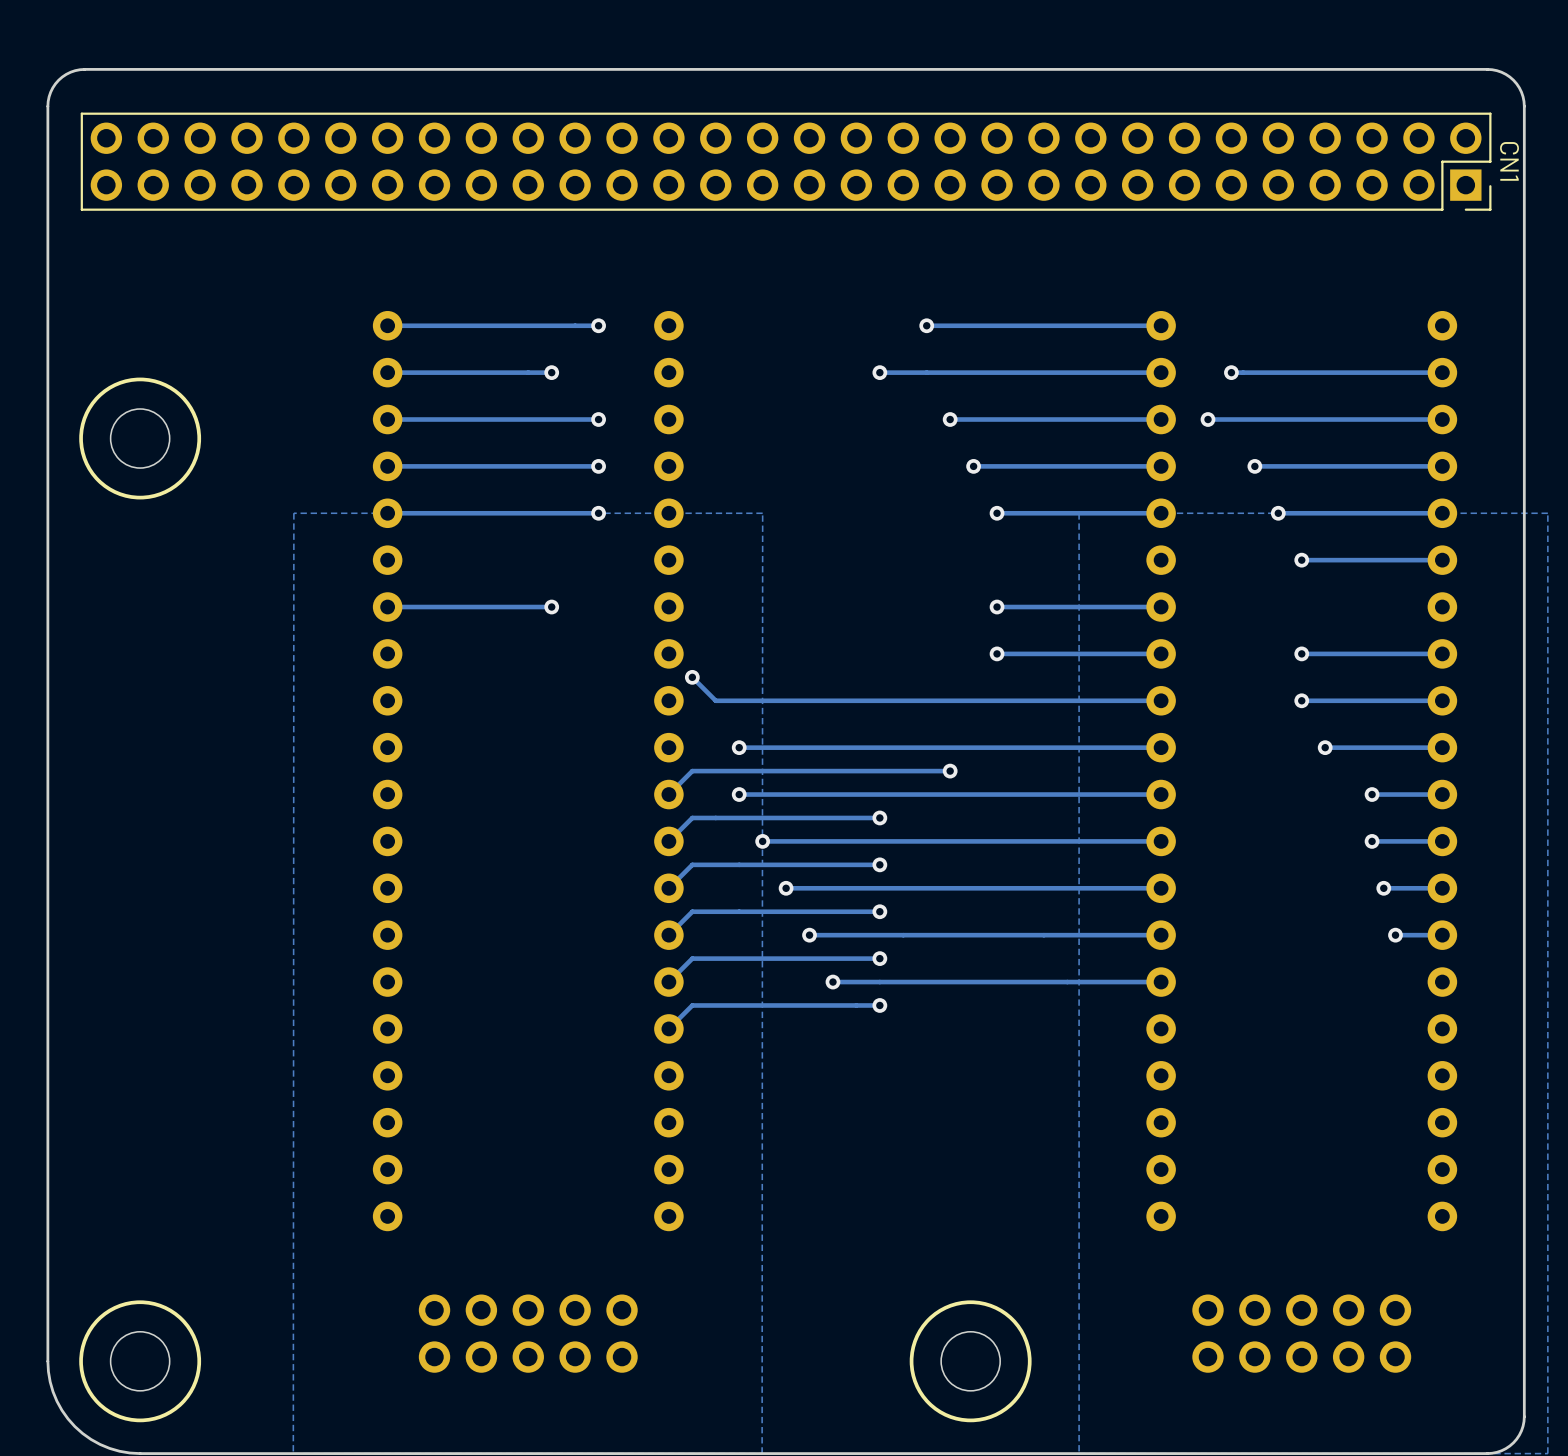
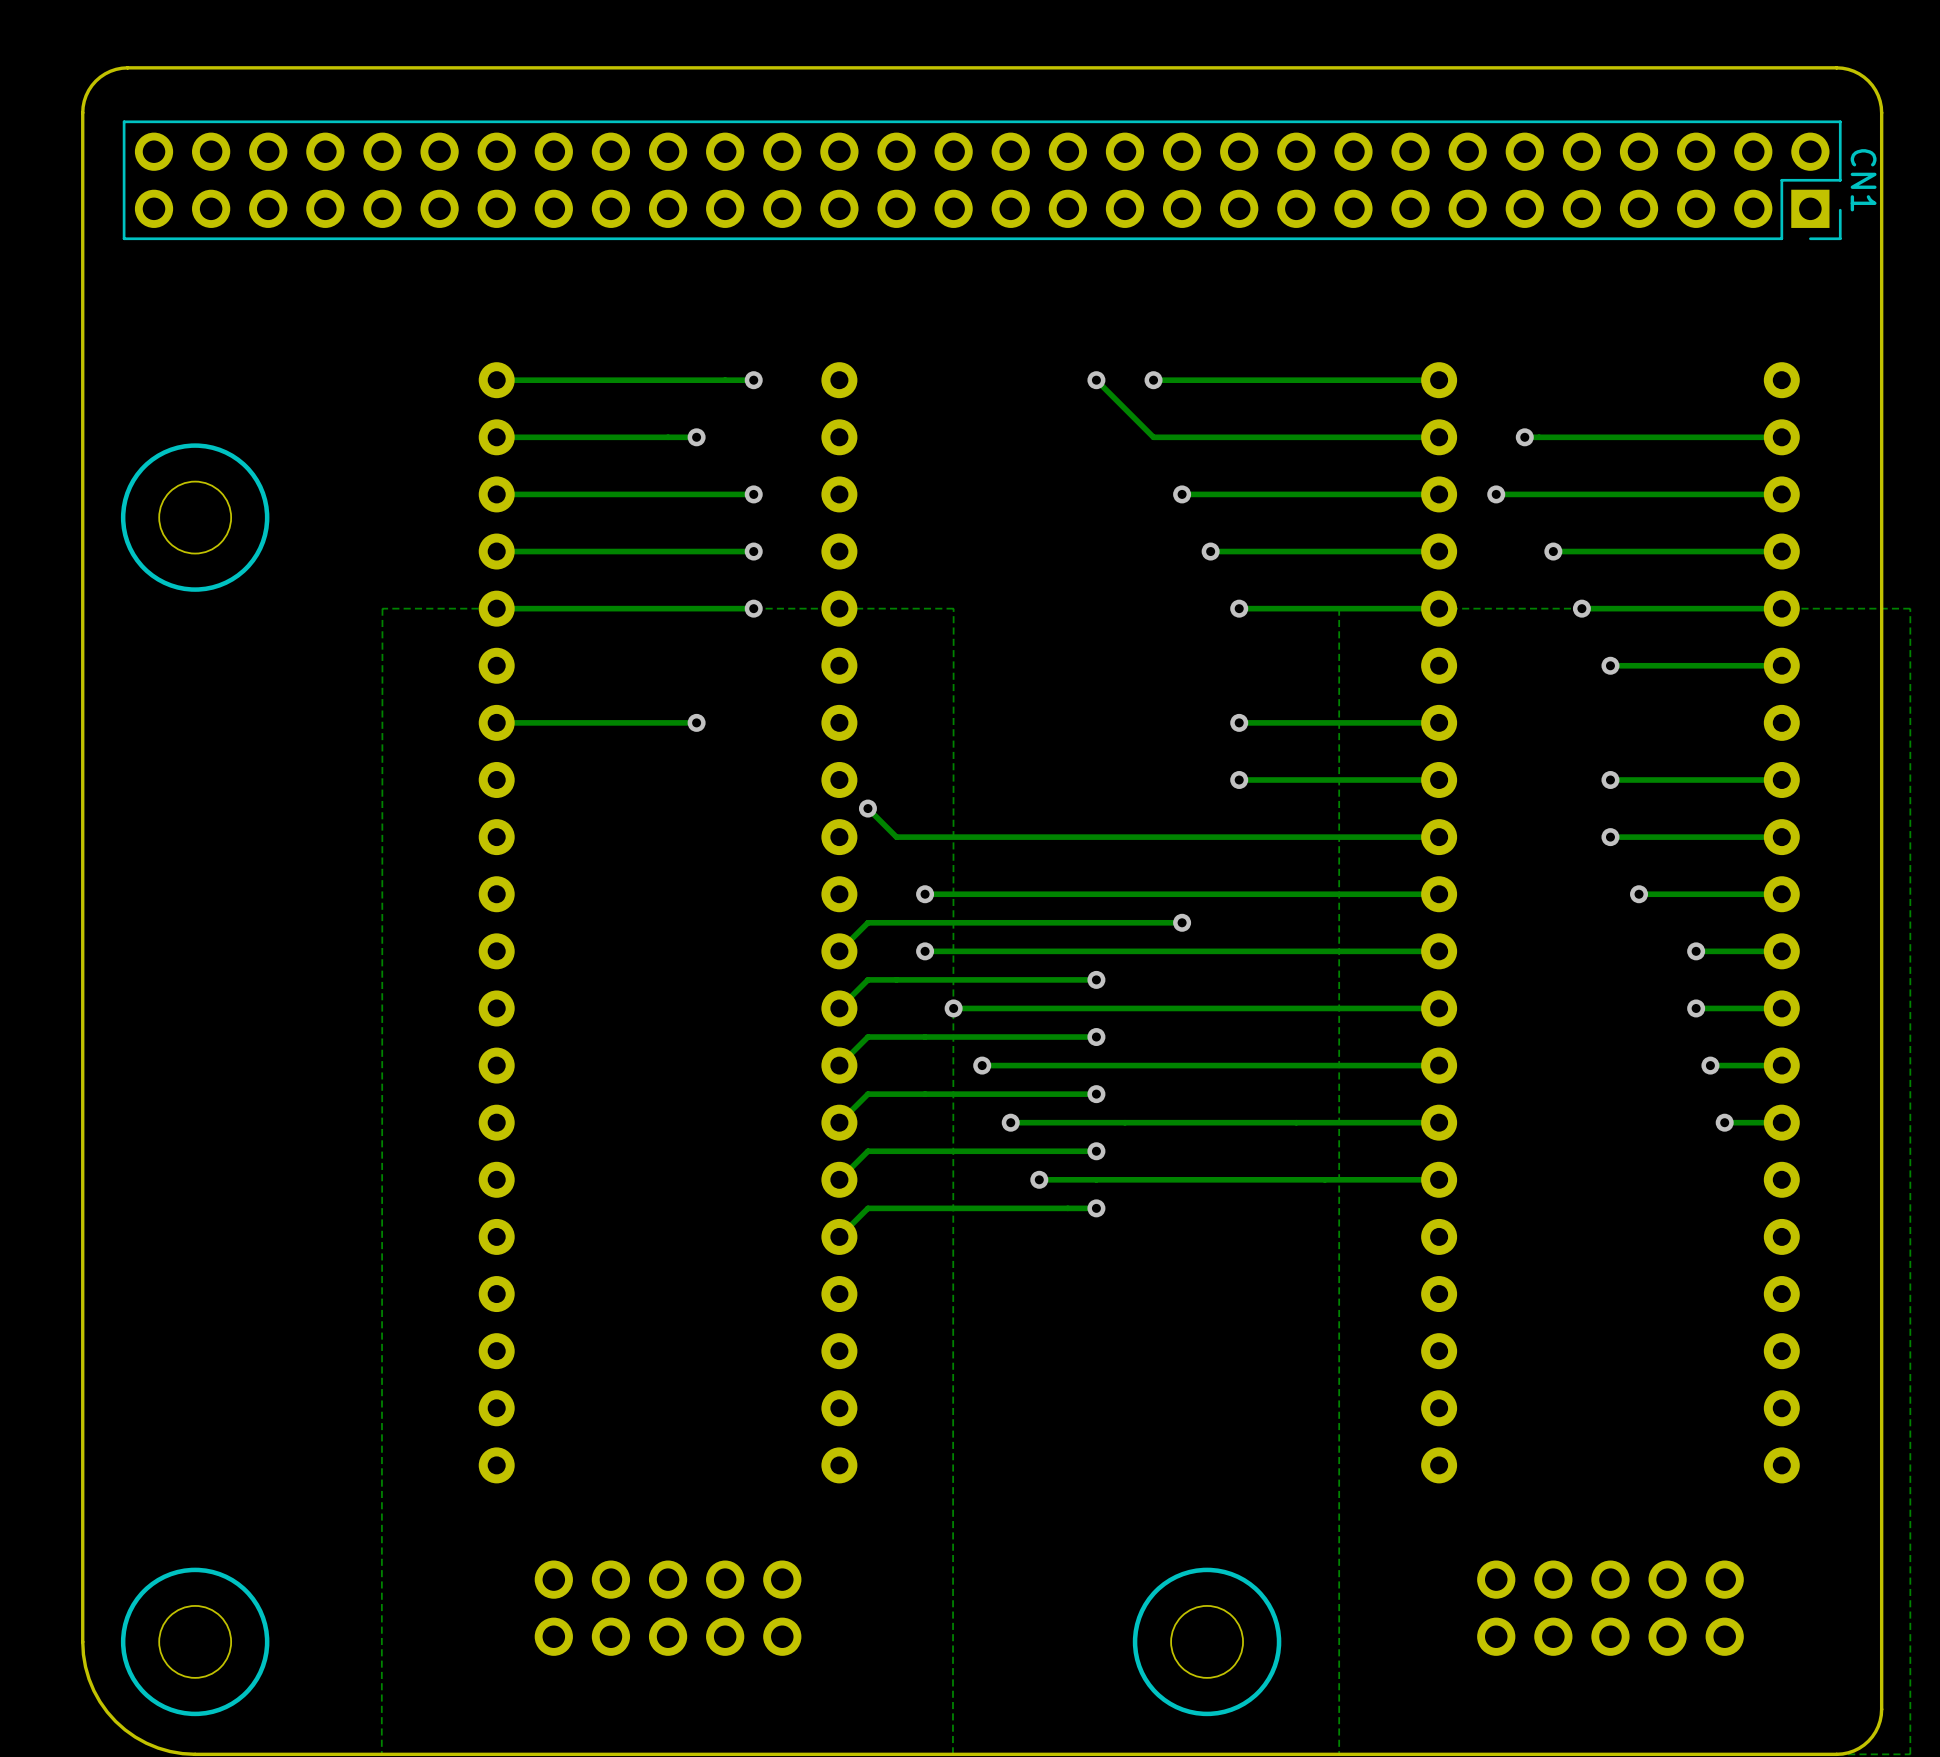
via position: (879, 372) -> (1096, 380)
track: (926, 372) (879, 372) -> (1153, 437) (1096, 380)

